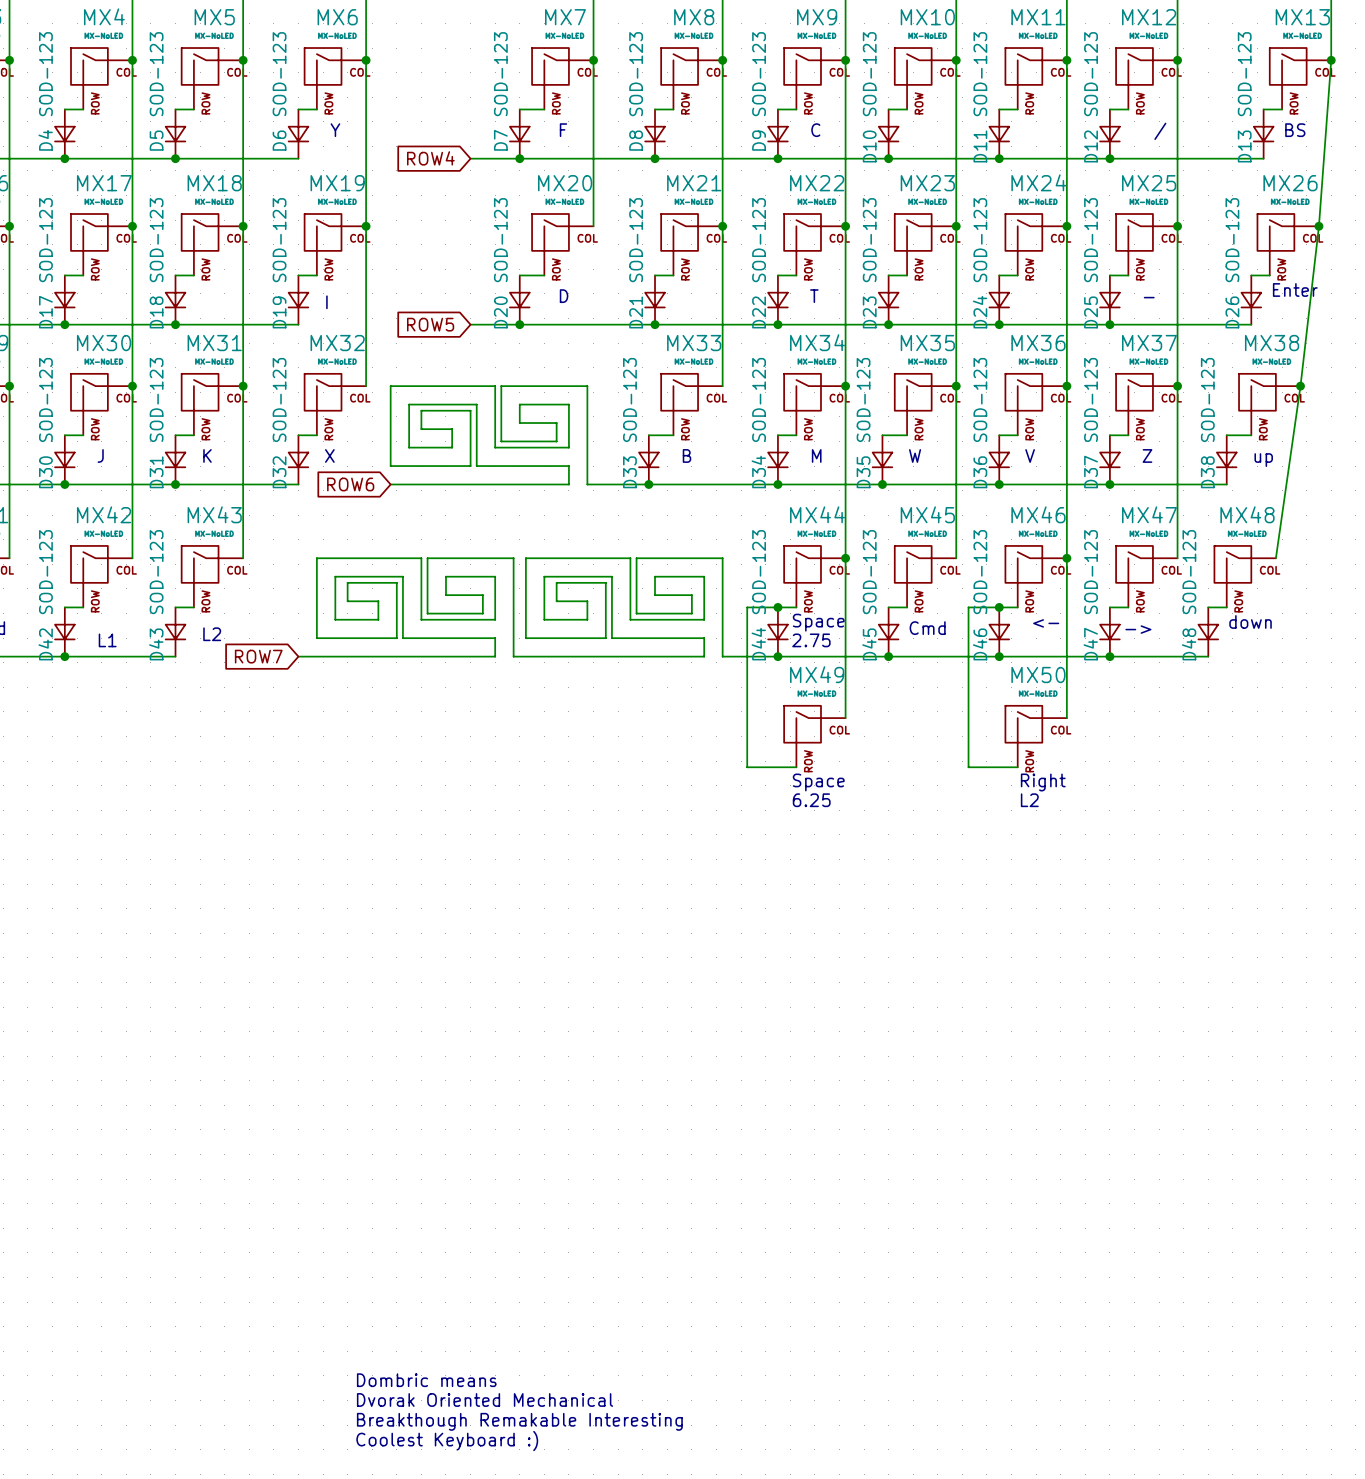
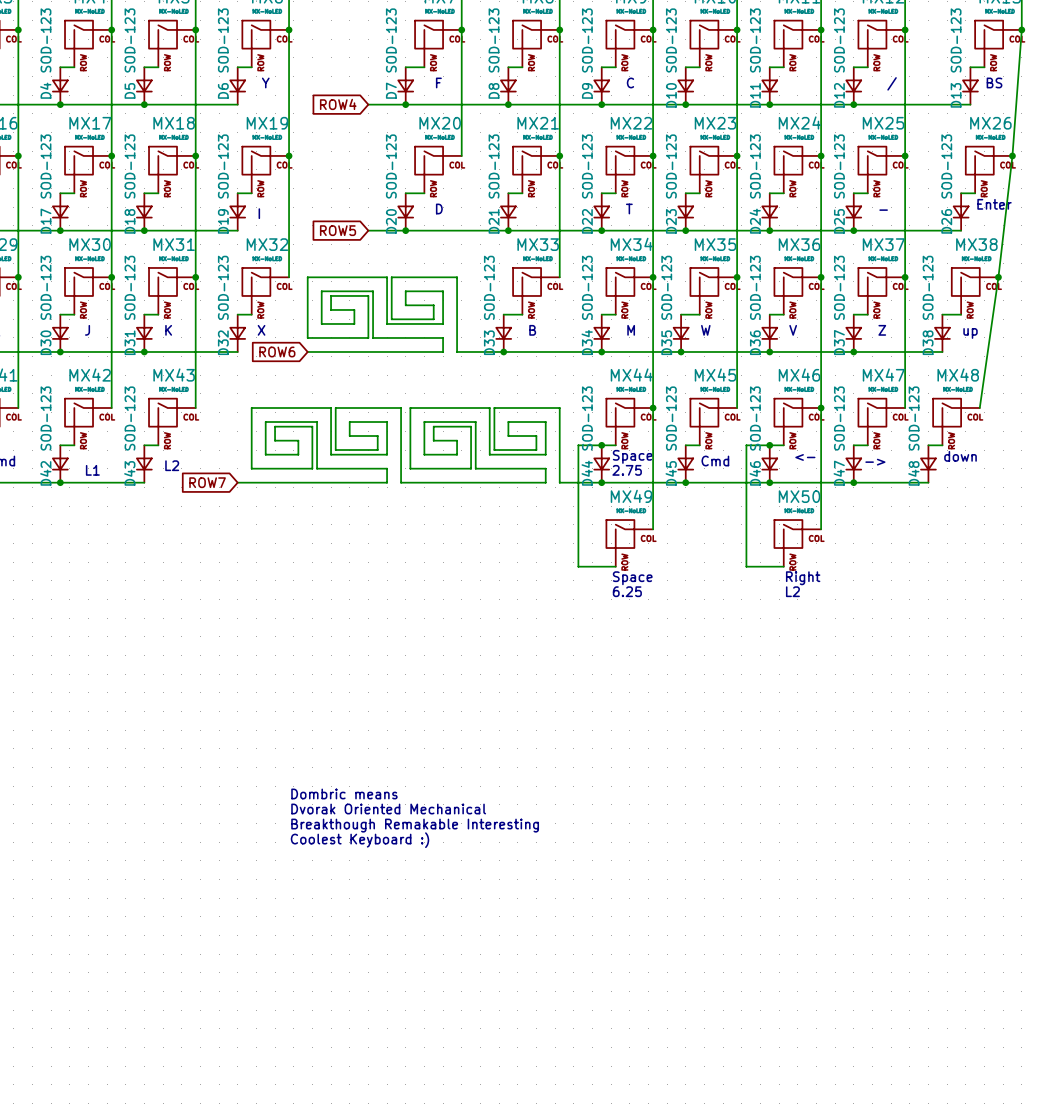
text: none -> Dombric means (344, 793)
text: none -> Dvorak Oriented Mechanical (388, 809)
text: none -> Breakthough Remakable Interesting (415, 825)
text: none -> Coolest Keyboard :) (360, 840)
text: Dombric means (426, 1380) -> none
text: Dvorak Oriented Mechanical (485, 1399) -> none
text: Breakthough Remakable Interesting (519, 1421) -> none
text: Coolest Keyboard :) (447, 1441) -> none

